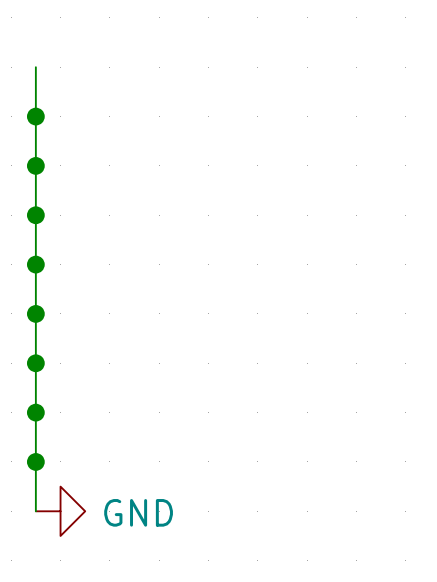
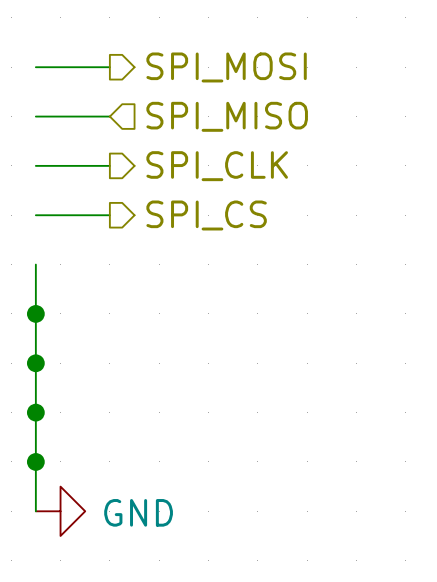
wire: (35, 67) (35, 264) -> (35, 67) (109, 67)
hierarchical label: none -> SPI_MOSI (226, 67)
wire: none -> (35, 116) (109, 116)
junction: (35, 116) -> none
hierarchical label: none -> SPI_MISO (227, 116)
wire: none -> (35, 165) (109, 165)
junction: (35, 165) -> none
hierarchical label: none -> SPI_CLK (217, 166)
wire: none -> (35, 215) (109, 215)
junction: (35, 215) -> none
hierarchical label: none -> SPI_CS (206, 215)
junction: (35, 264) -> none

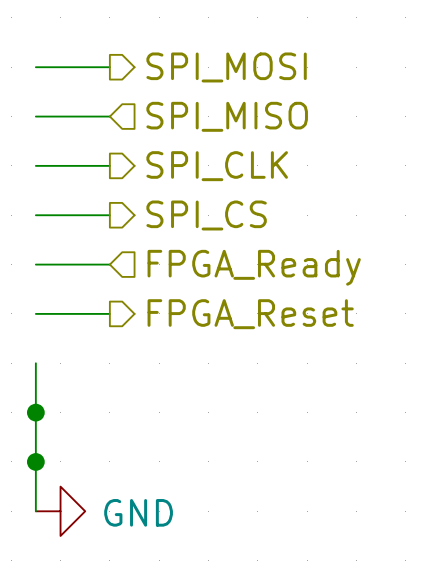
wire: (35, 264) (35, 363) -> (35, 264) (109, 264)
hierarchical label: none -> FPGA_Ready (254, 267)
wire: none -> (35, 313) (109, 313)
junction: (35, 313) -> none
hierarchical label: none -> FPGA_Reset (250, 314)
junction: (35, 363) -> none

